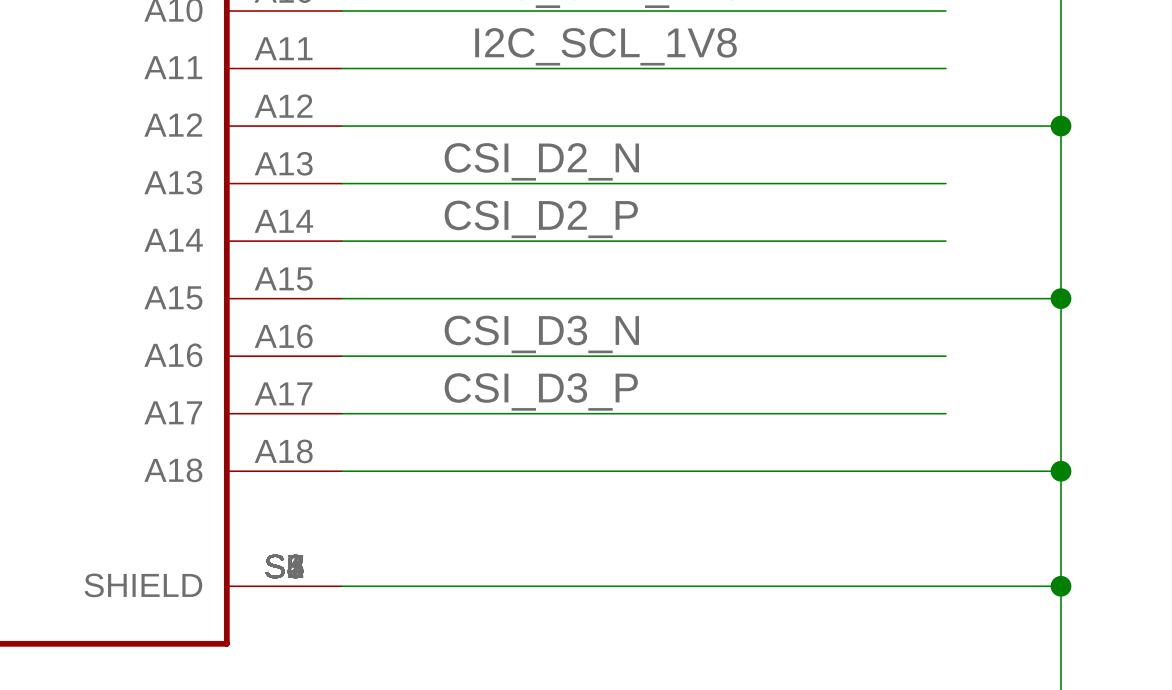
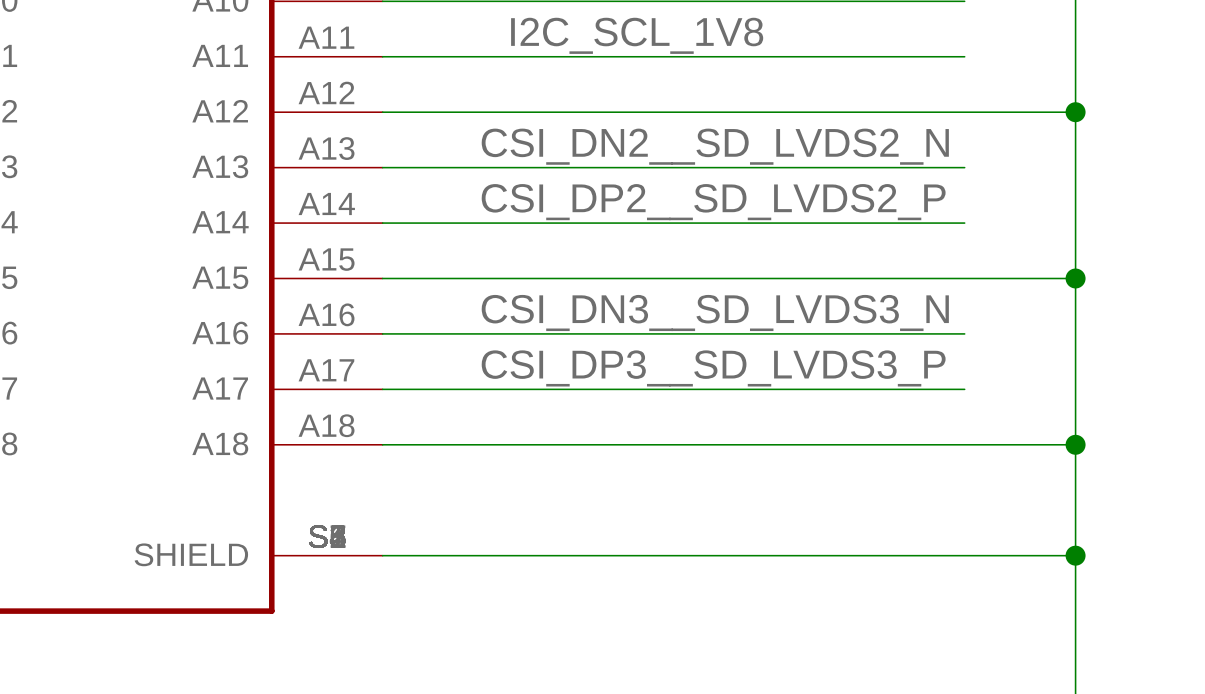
label: CSI_D2_N (541, 161) -> CSI_DN2__SD_LVDS2_N (715, 146)
label: CSI_D2_P (541, 219) -> CSI_DP2__SD_LVDS2_P (713, 202)
label: CSI_D3_N (541, 334) -> CSI_DN3__SD_LVDS3_N (715, 312)
label: CSI_D3_P (541, 391) -> CSI_DP3__SD_LVDS3_P (713, 368)

